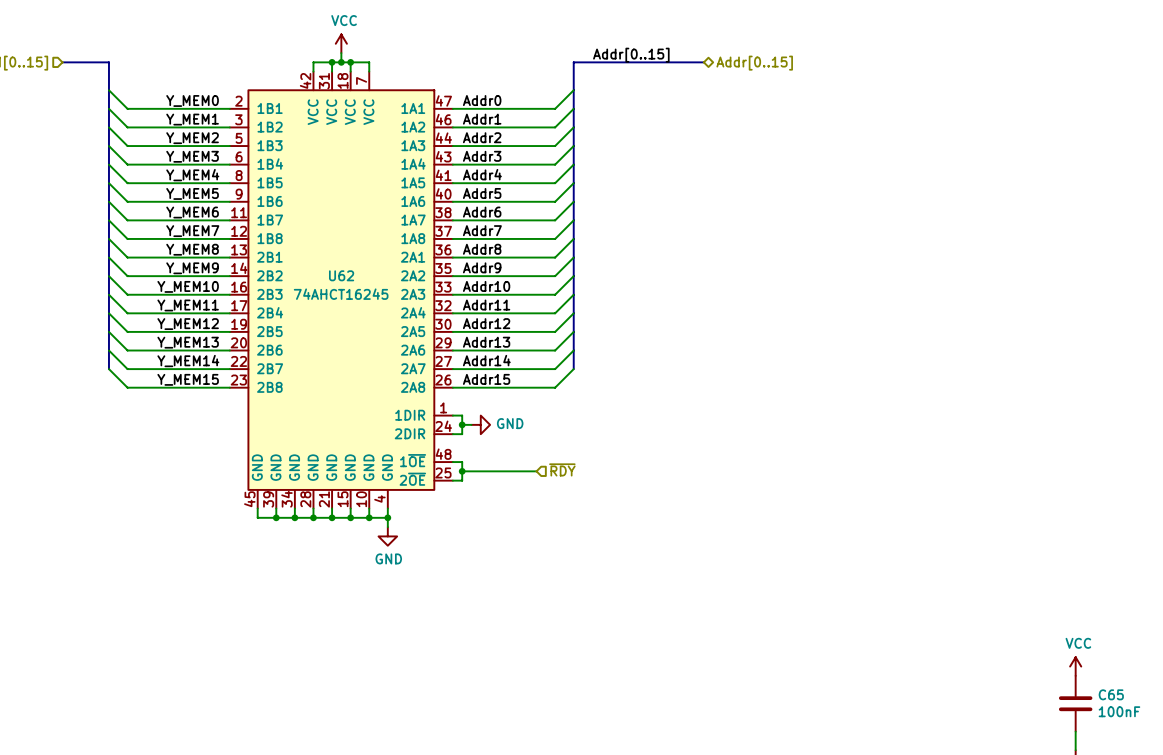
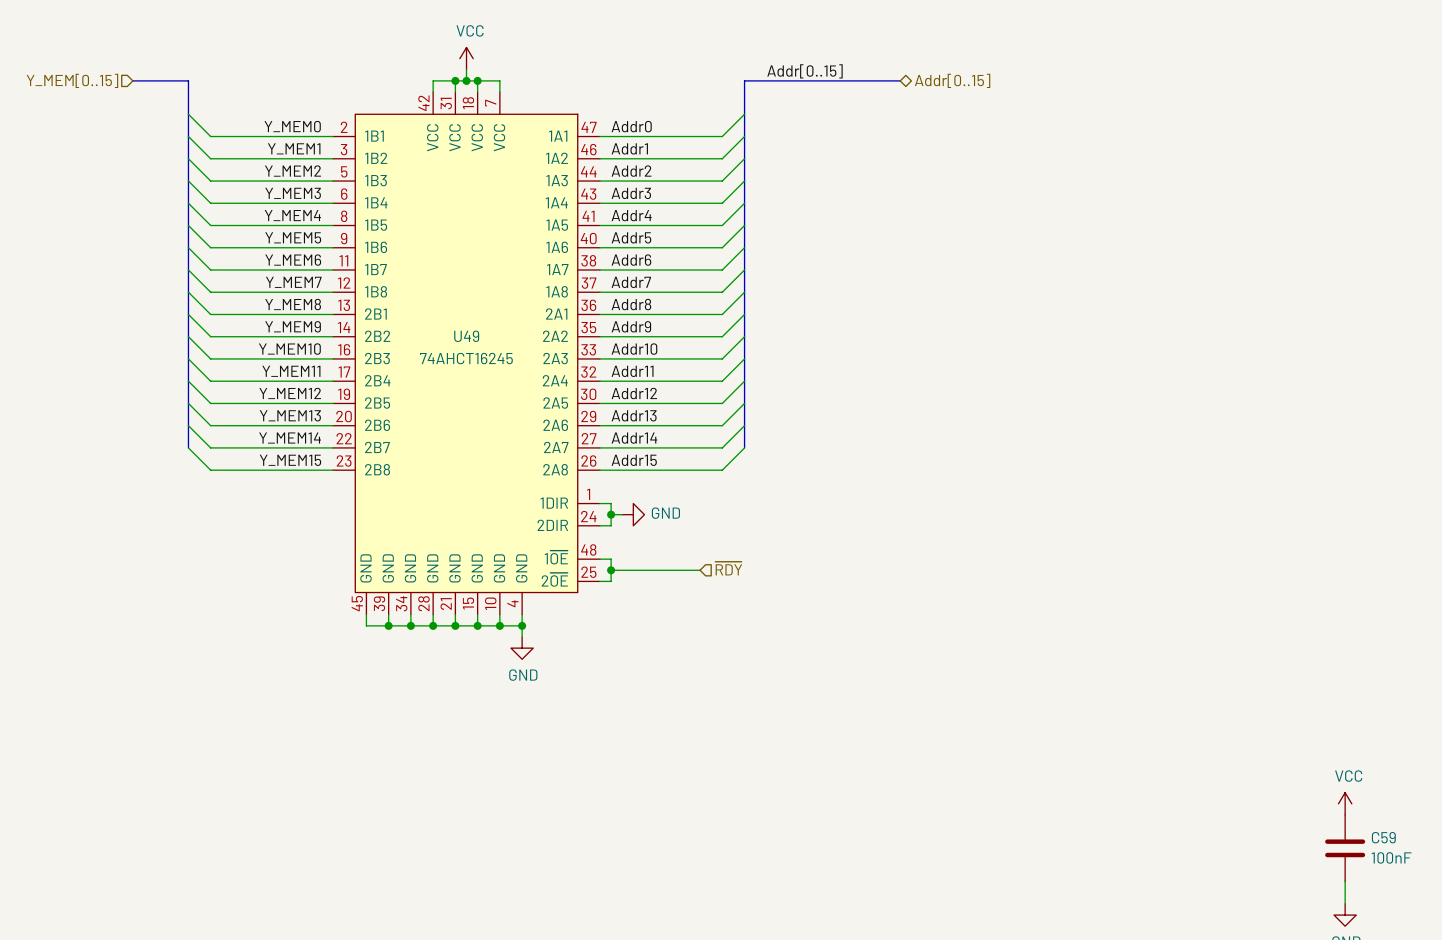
U62 name: U62 (341, 275) -> U49 (466, 336)
C65 name: C65 (1111, 694) -> C59 (1383, 837)

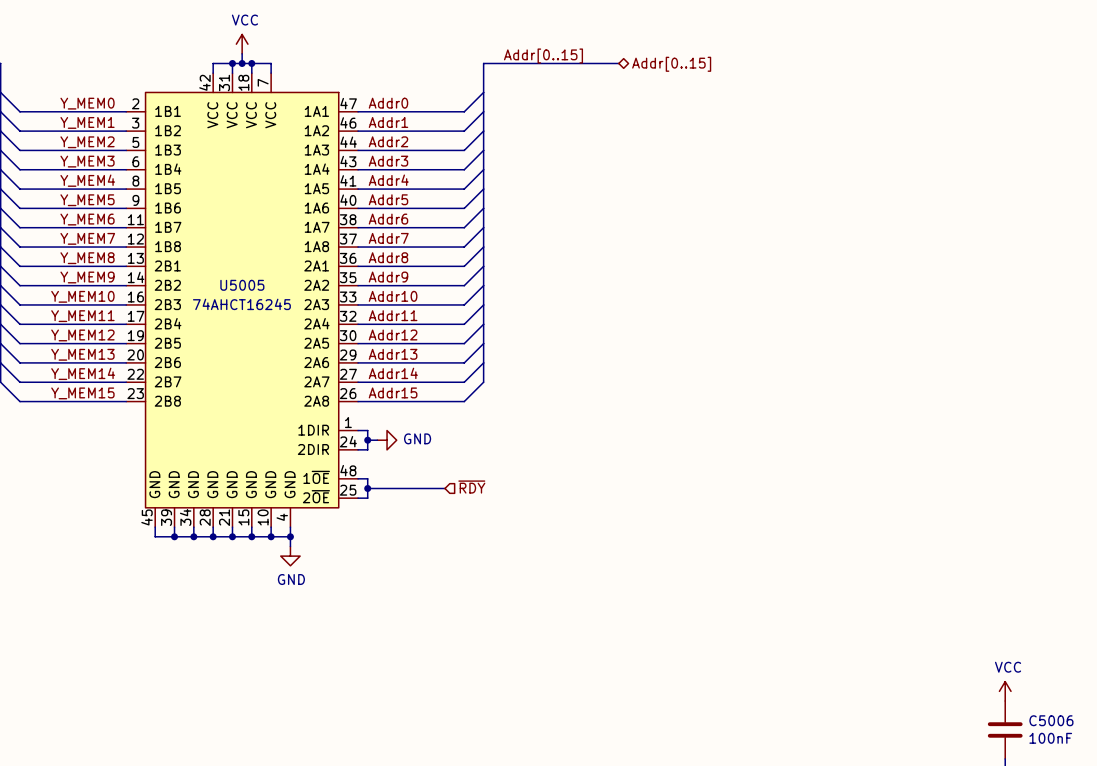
U49 name: U49 (466, 336) -> U5005 (242, 285)
C59 name: C59 (1383, 837) -> C5006 (1051, 720)

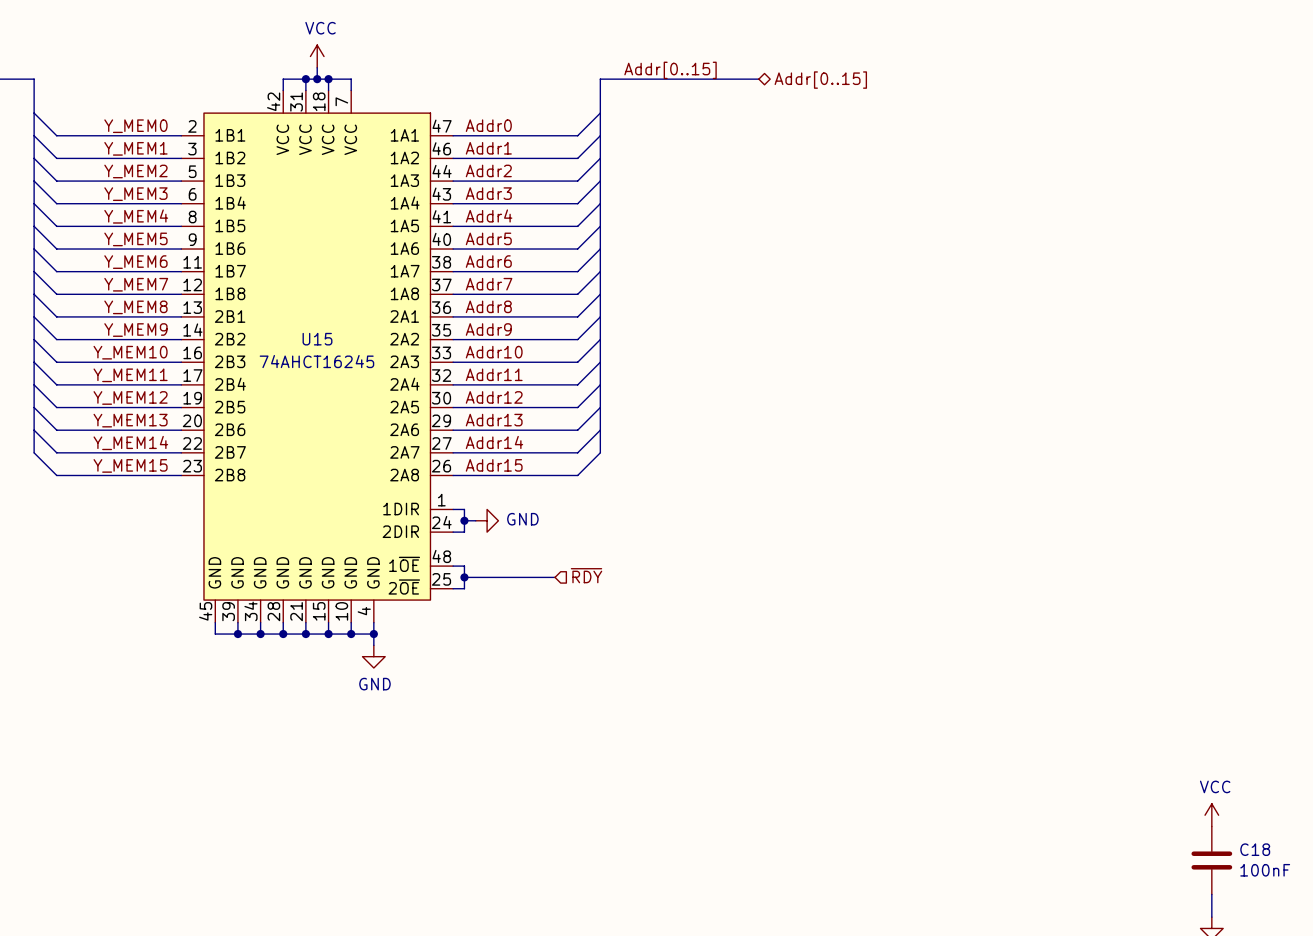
U5005 name: U5005 (242, 285) -> U15 (317, 339)
C5006 name: C5006 (1051, 720) -> C18 (1255, 849)

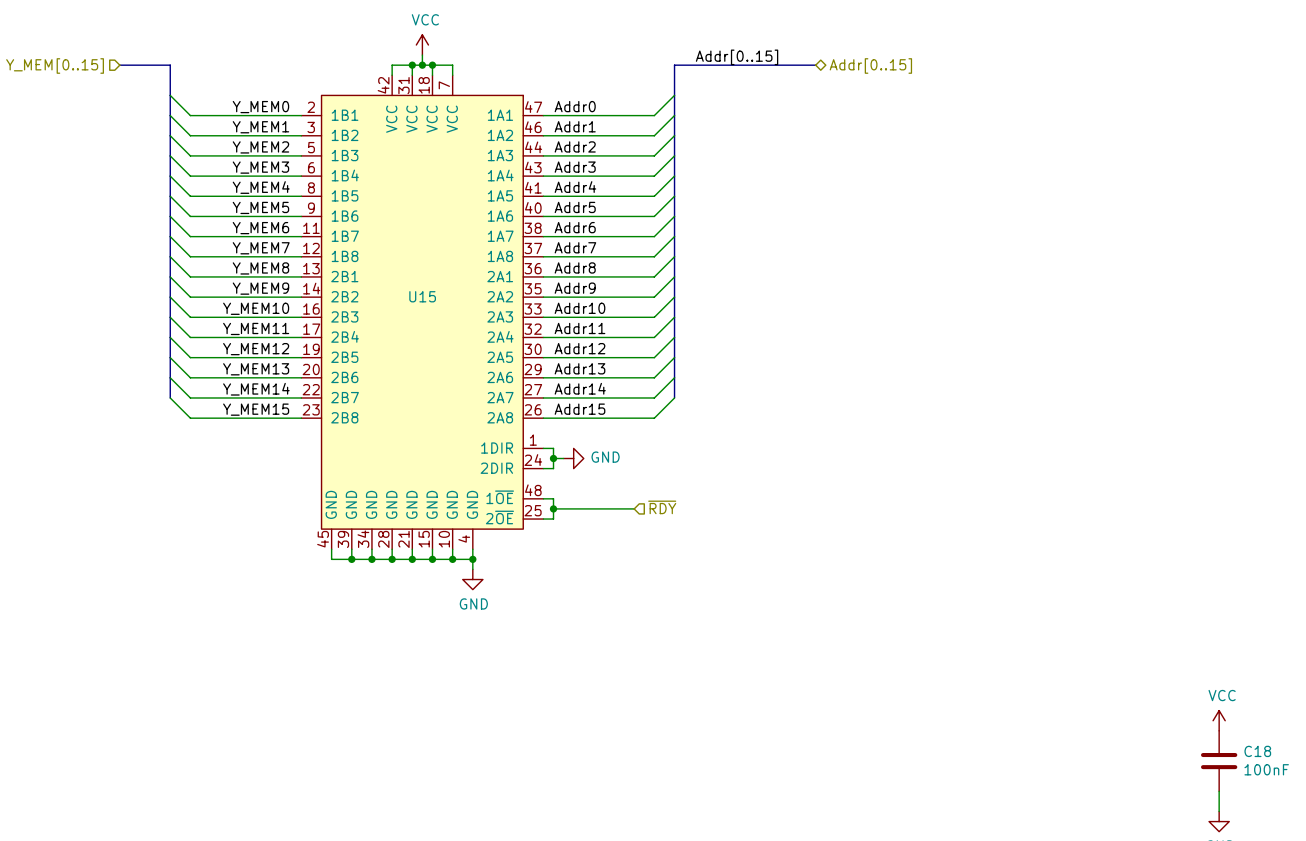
U15 value: 74AHCT16245 (316, 361) -> none

